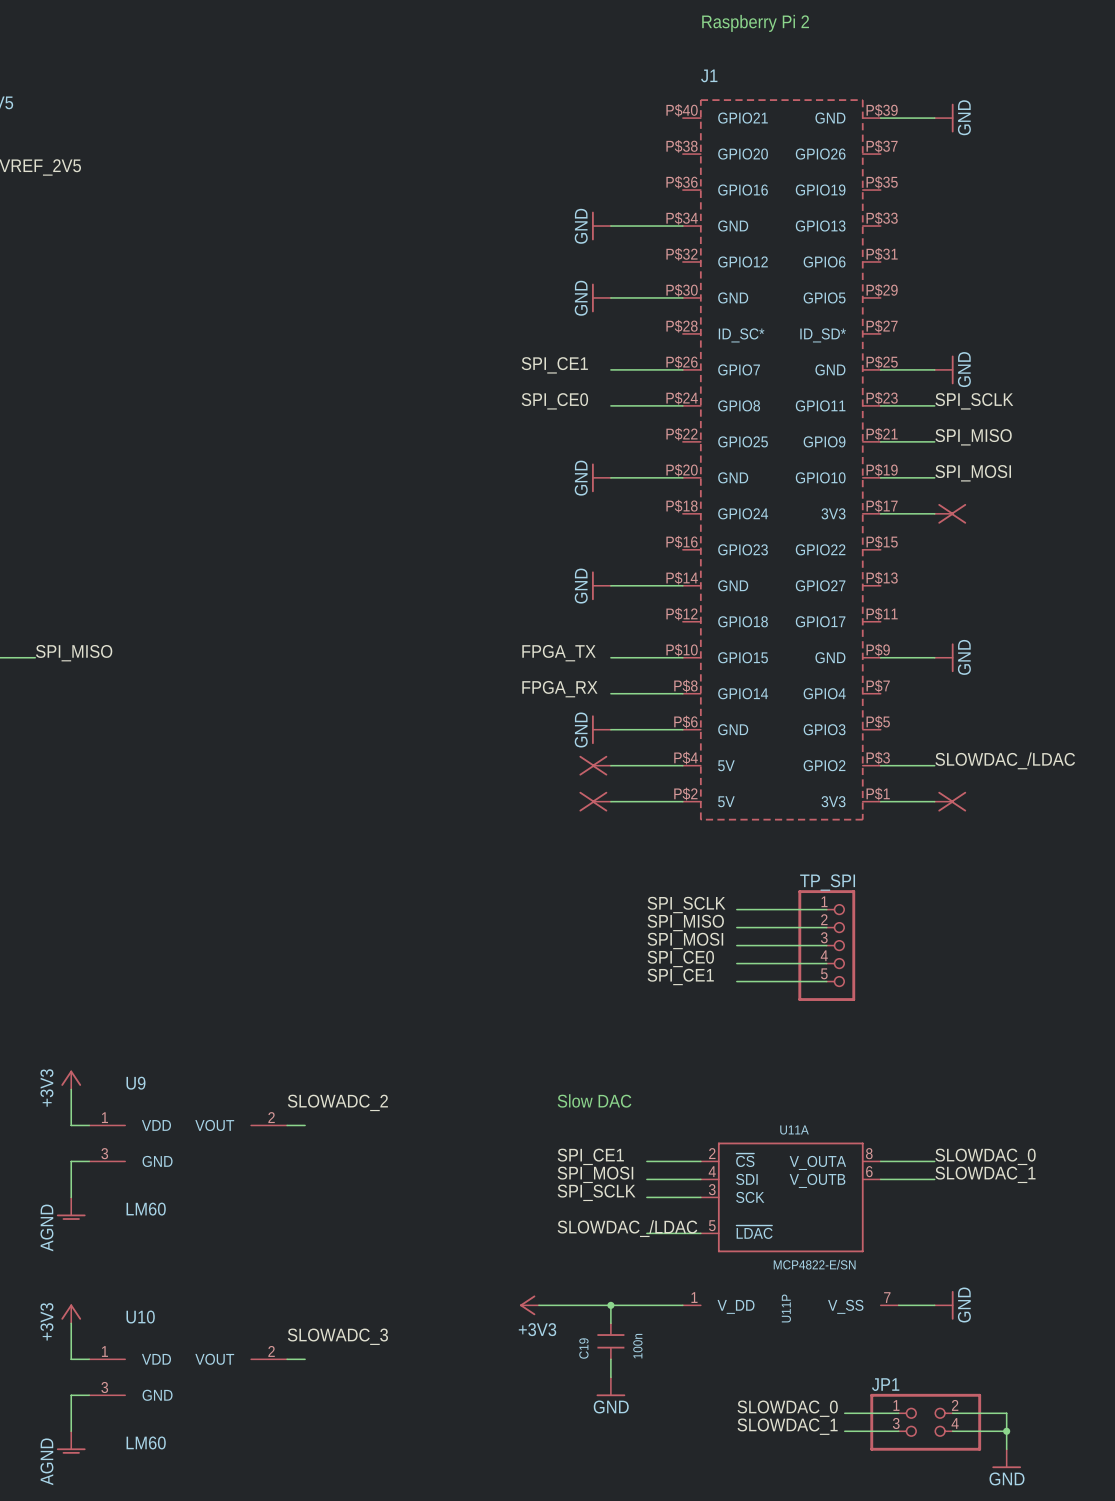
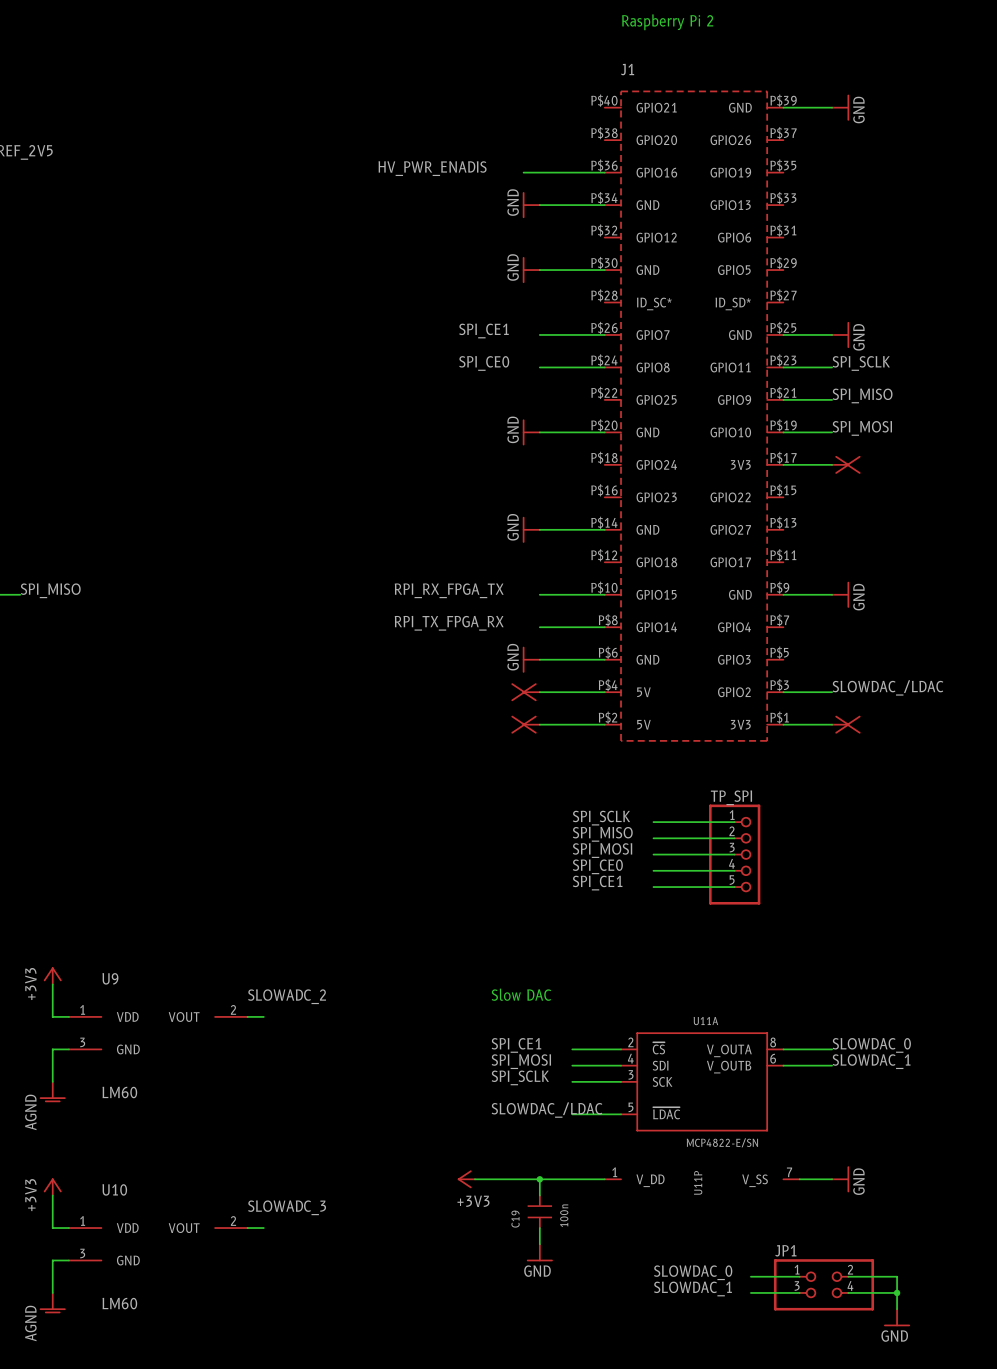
label: none -> HV_PWR_ENADIS (432, 168)
wire: none -> (523, 172) (604, 172)
label: FPGA_TX (558, 653) -> RPI_RX_FPGA_TX (449, 590)
label: FPGA_RX (559, 689) -> RPI_TX_FPGA_RX (449, 623)

